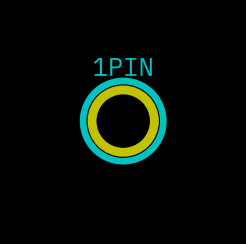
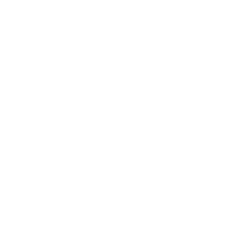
1PIN: (123, 121) -> none

